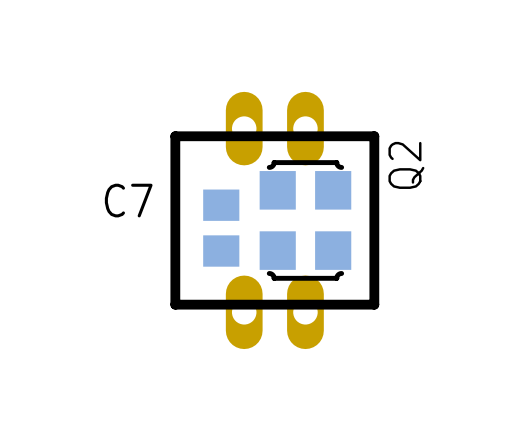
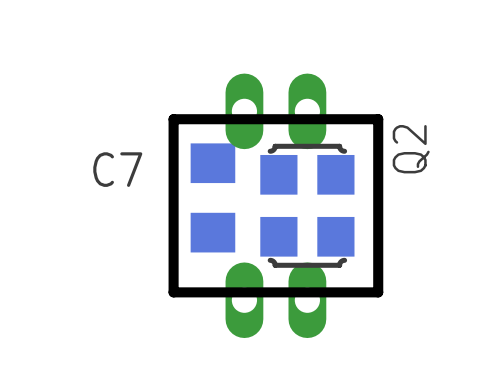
C7 footprint: [203, 189, 240, 267] -> [190, 143, 236, 253]

